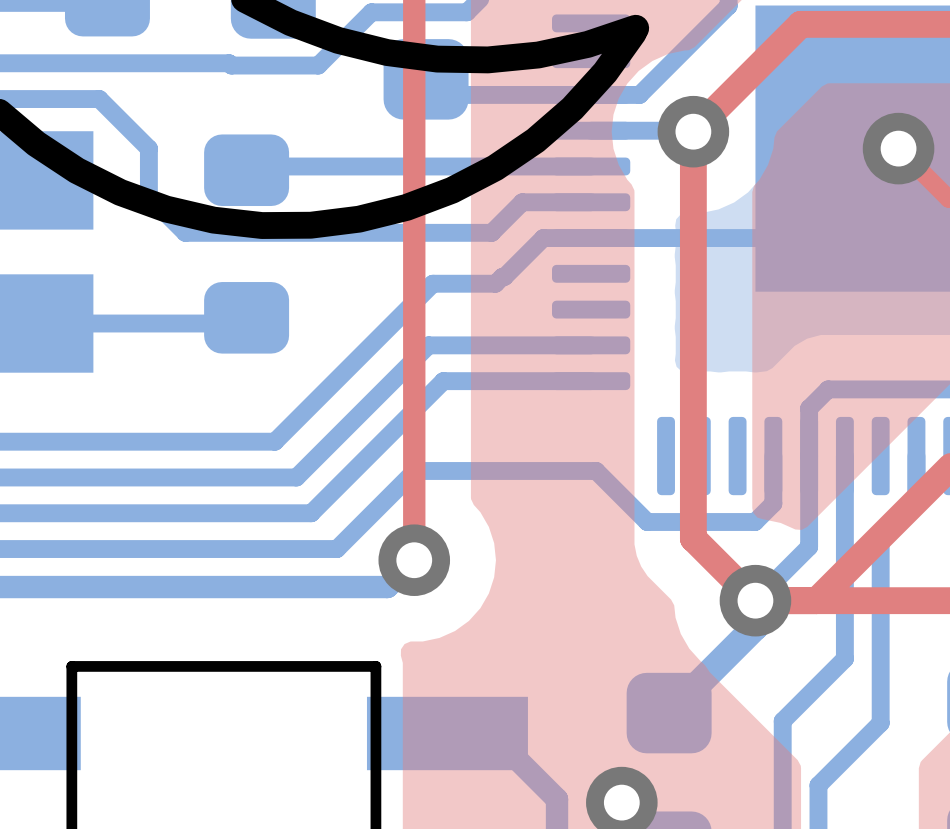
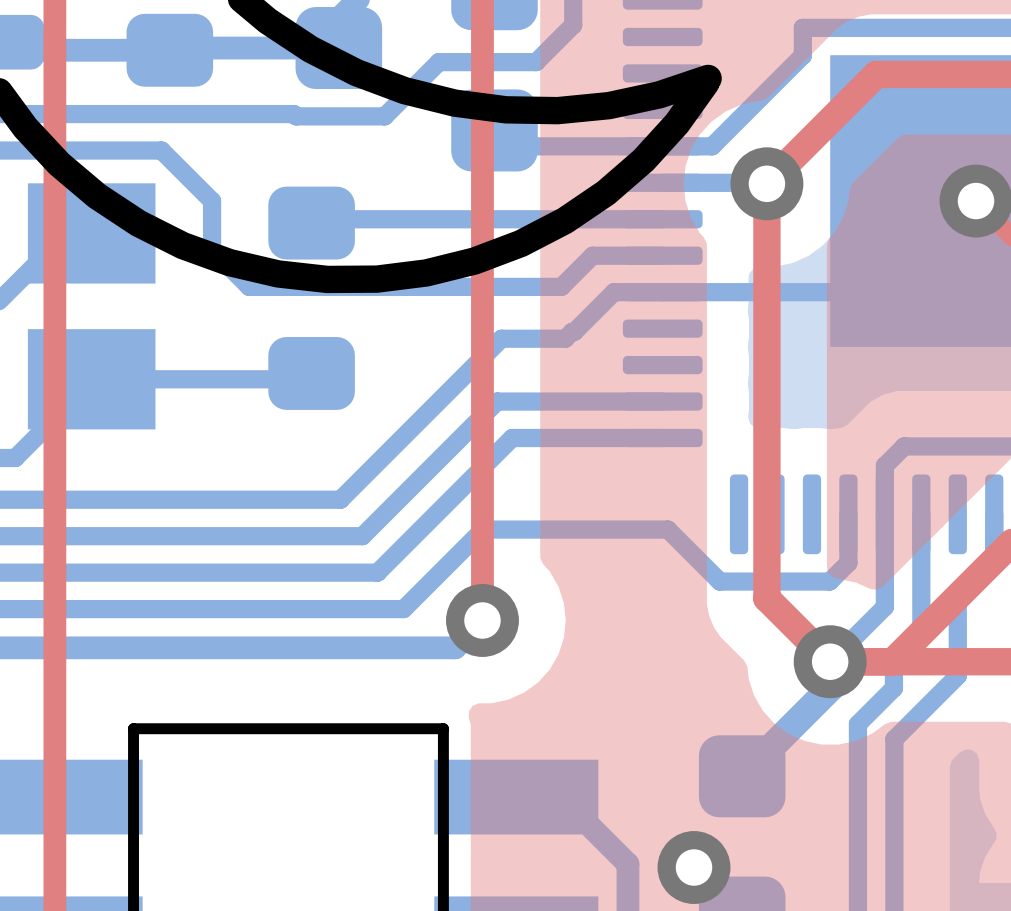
bottom track: (844, 578) (844, 658) (782, 721) -> (921, 638) (893, 666) (893, 688) (857, 724) (857, 784)
bottom track: (880, 614) (880, 723) (818, 785) -> (957, 675) (894, 739) (894, 849)

